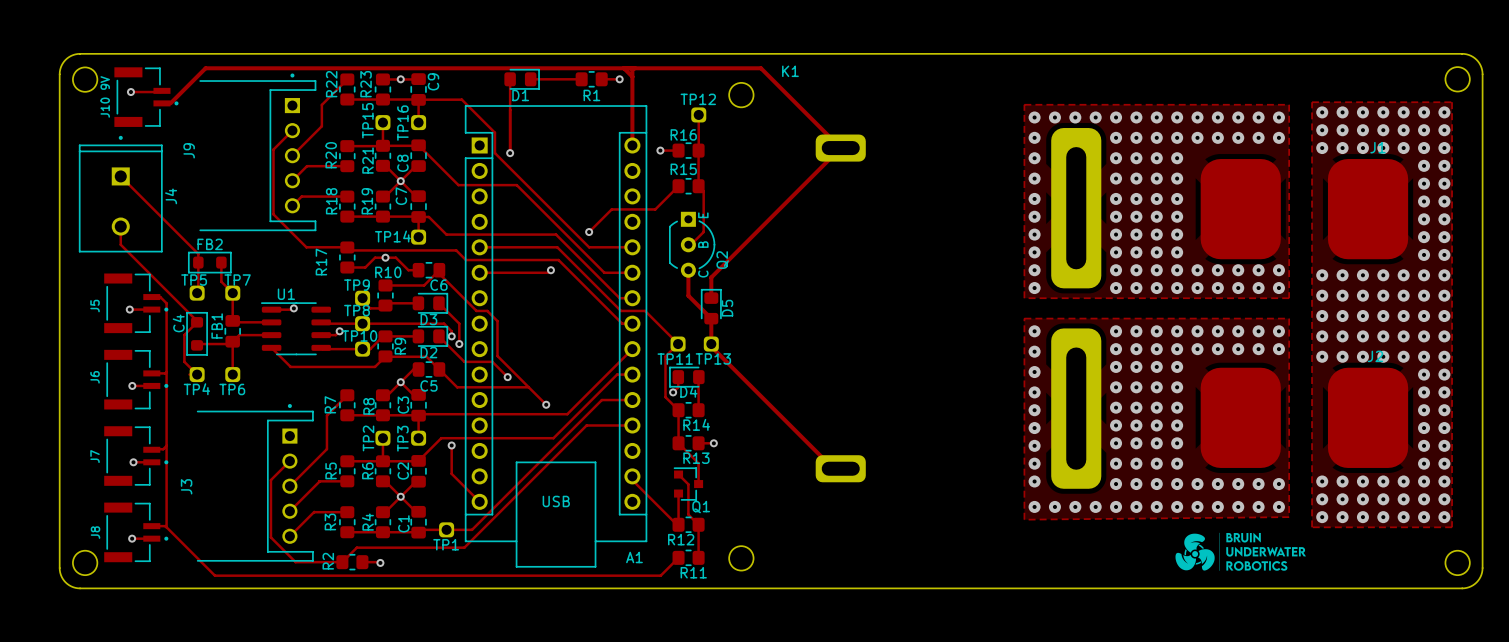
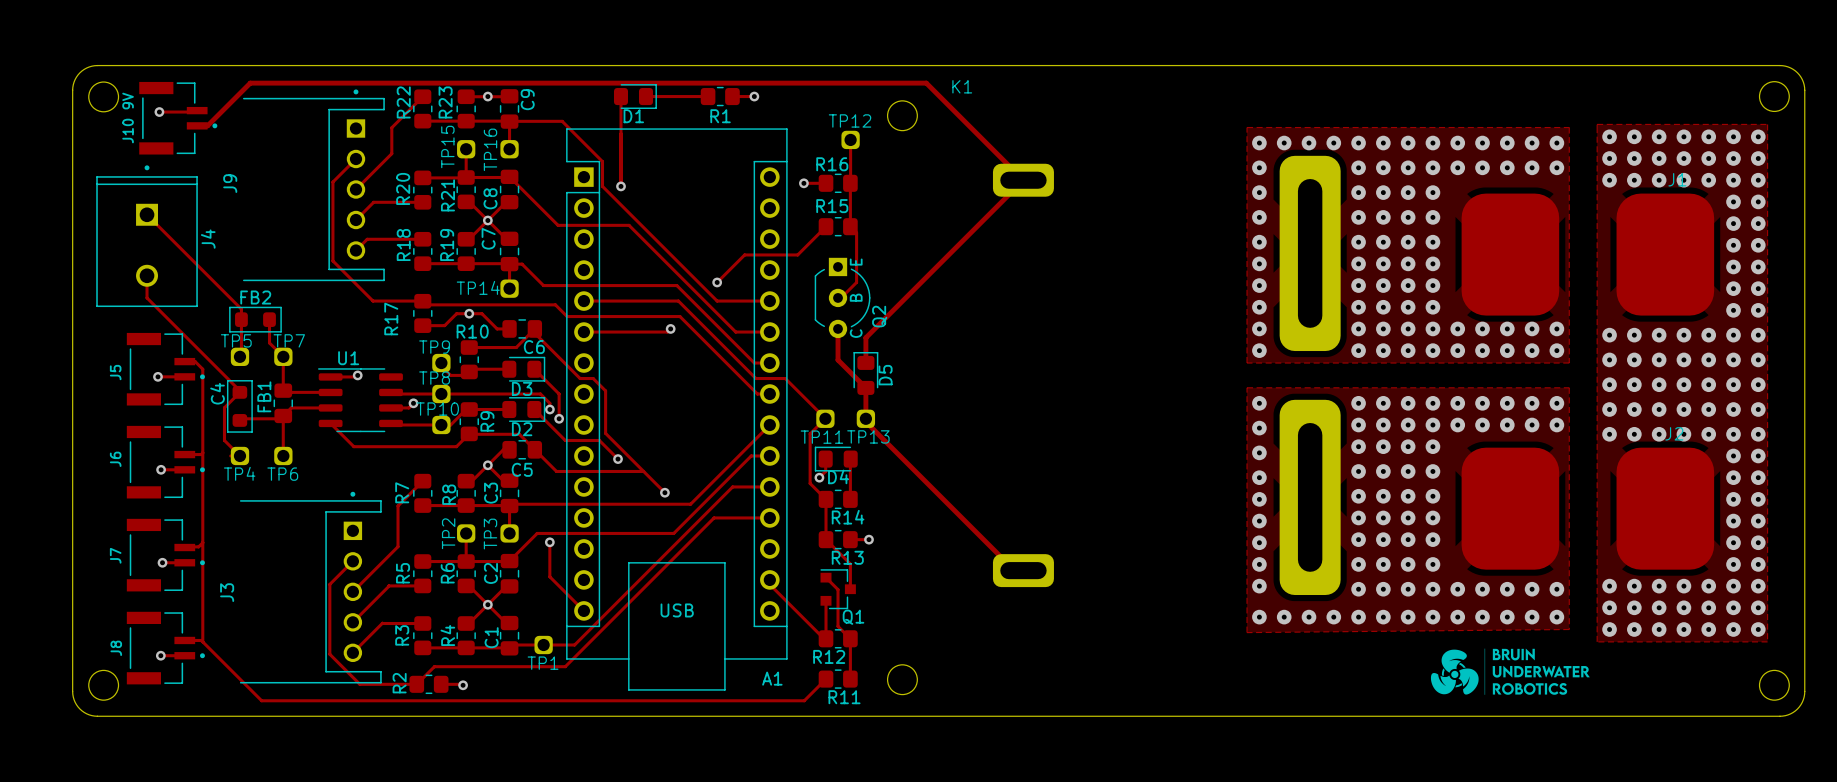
track: (623, 68) (632, 76) -> none
track: (632, 68) (632, 145) -> none

